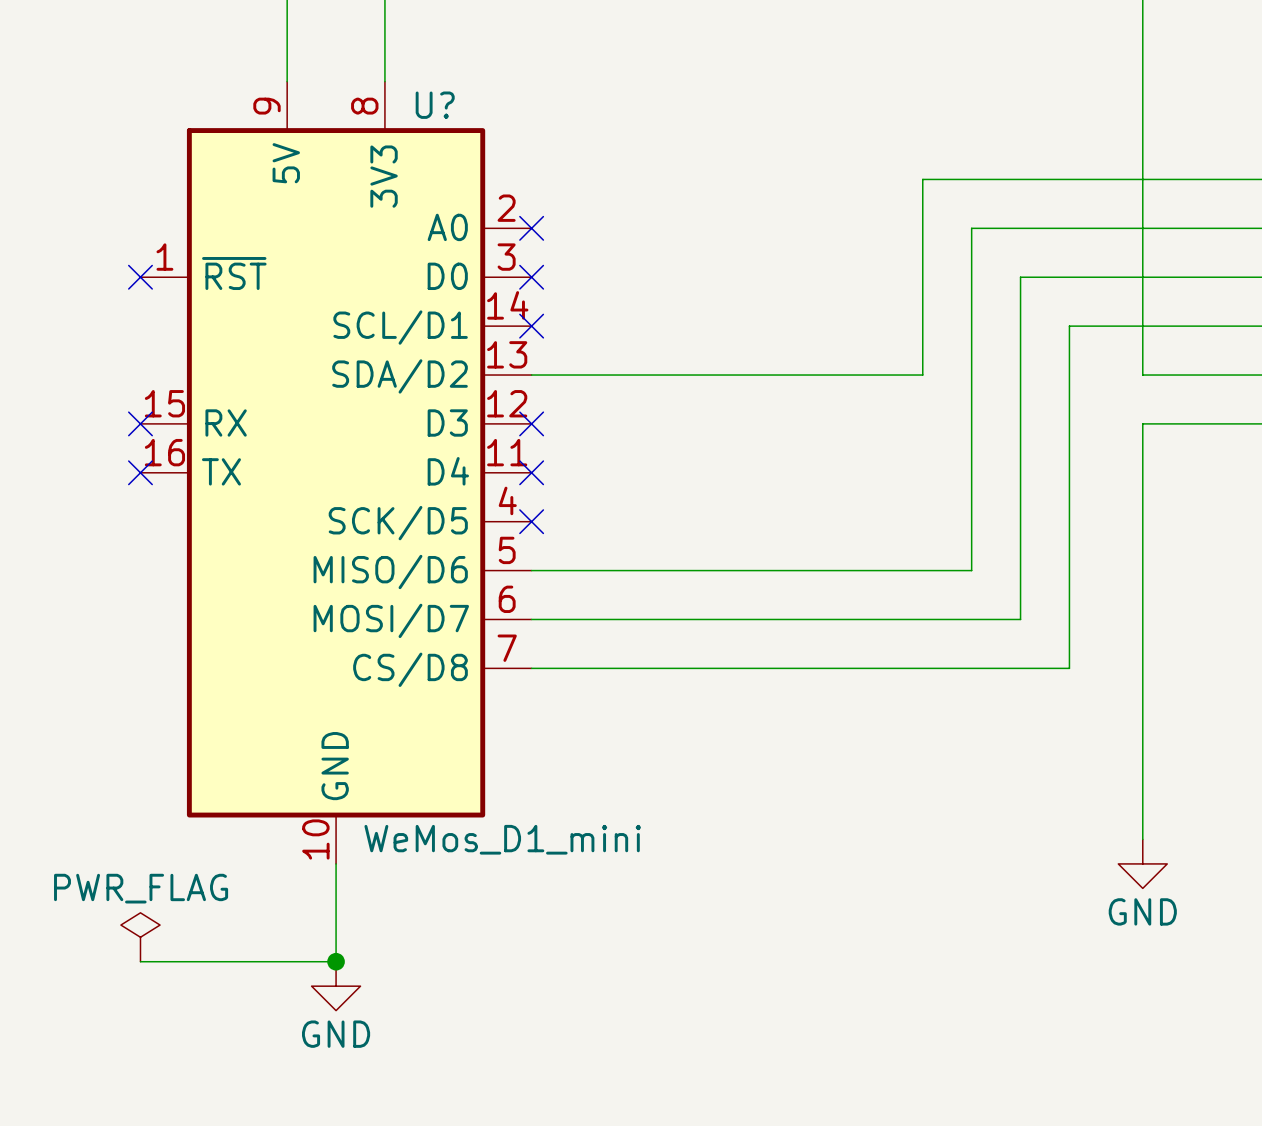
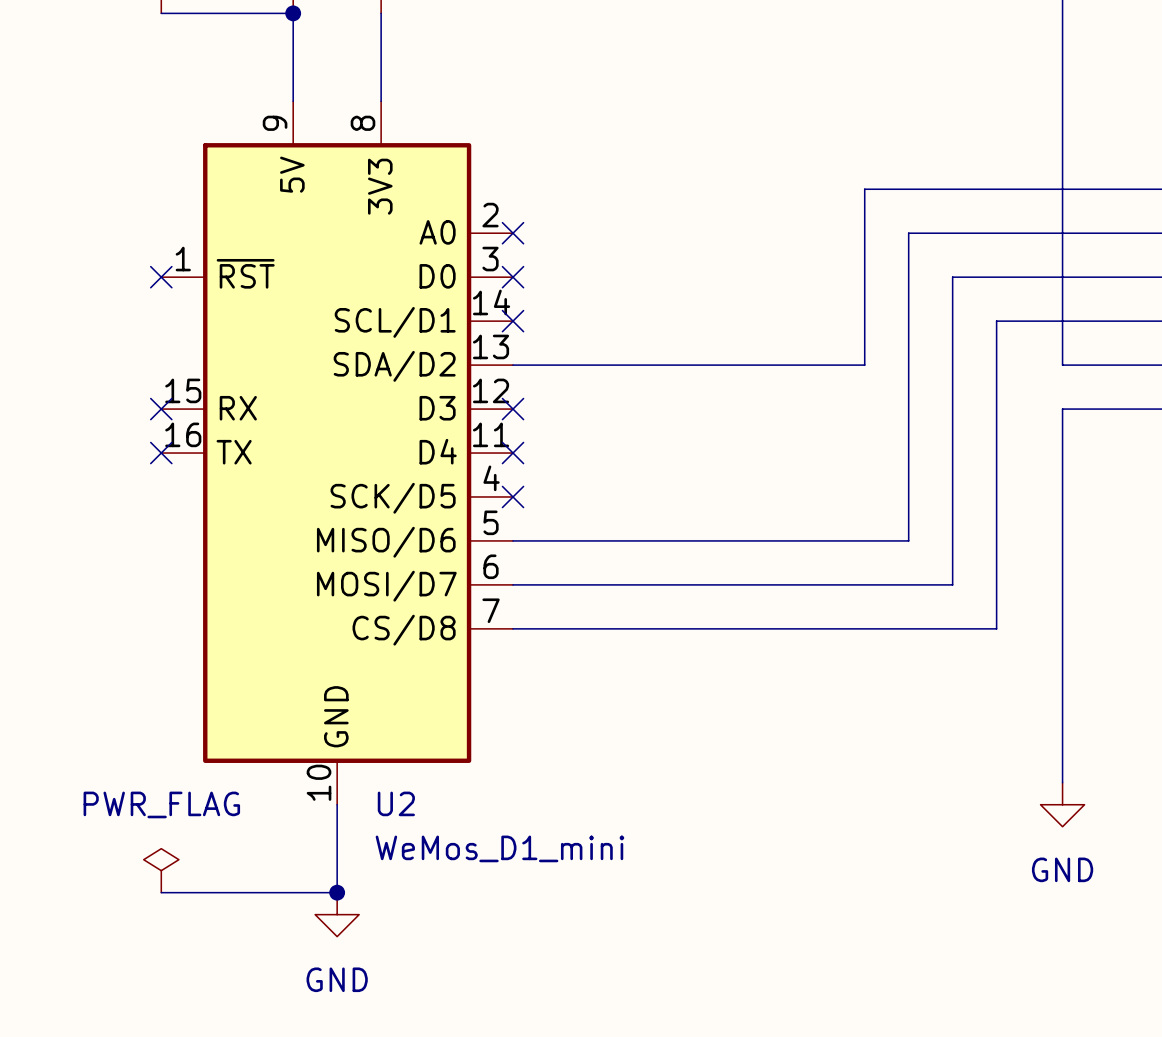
U? name: U? (435, 105) -> U2 (396, 803)
U? value position: WeMos_D1_mini (502, 839) -> WeMos_D1_mini (499, 848)
power symbol text position: PWR_FLAG (141, 888) -> PWR_FLAG (161, 804)
power symbol text position: GND (1142, 911) -> GND (1062, 869)
power symbol text position: GND (336, 1034) -> GND (337, 979)

